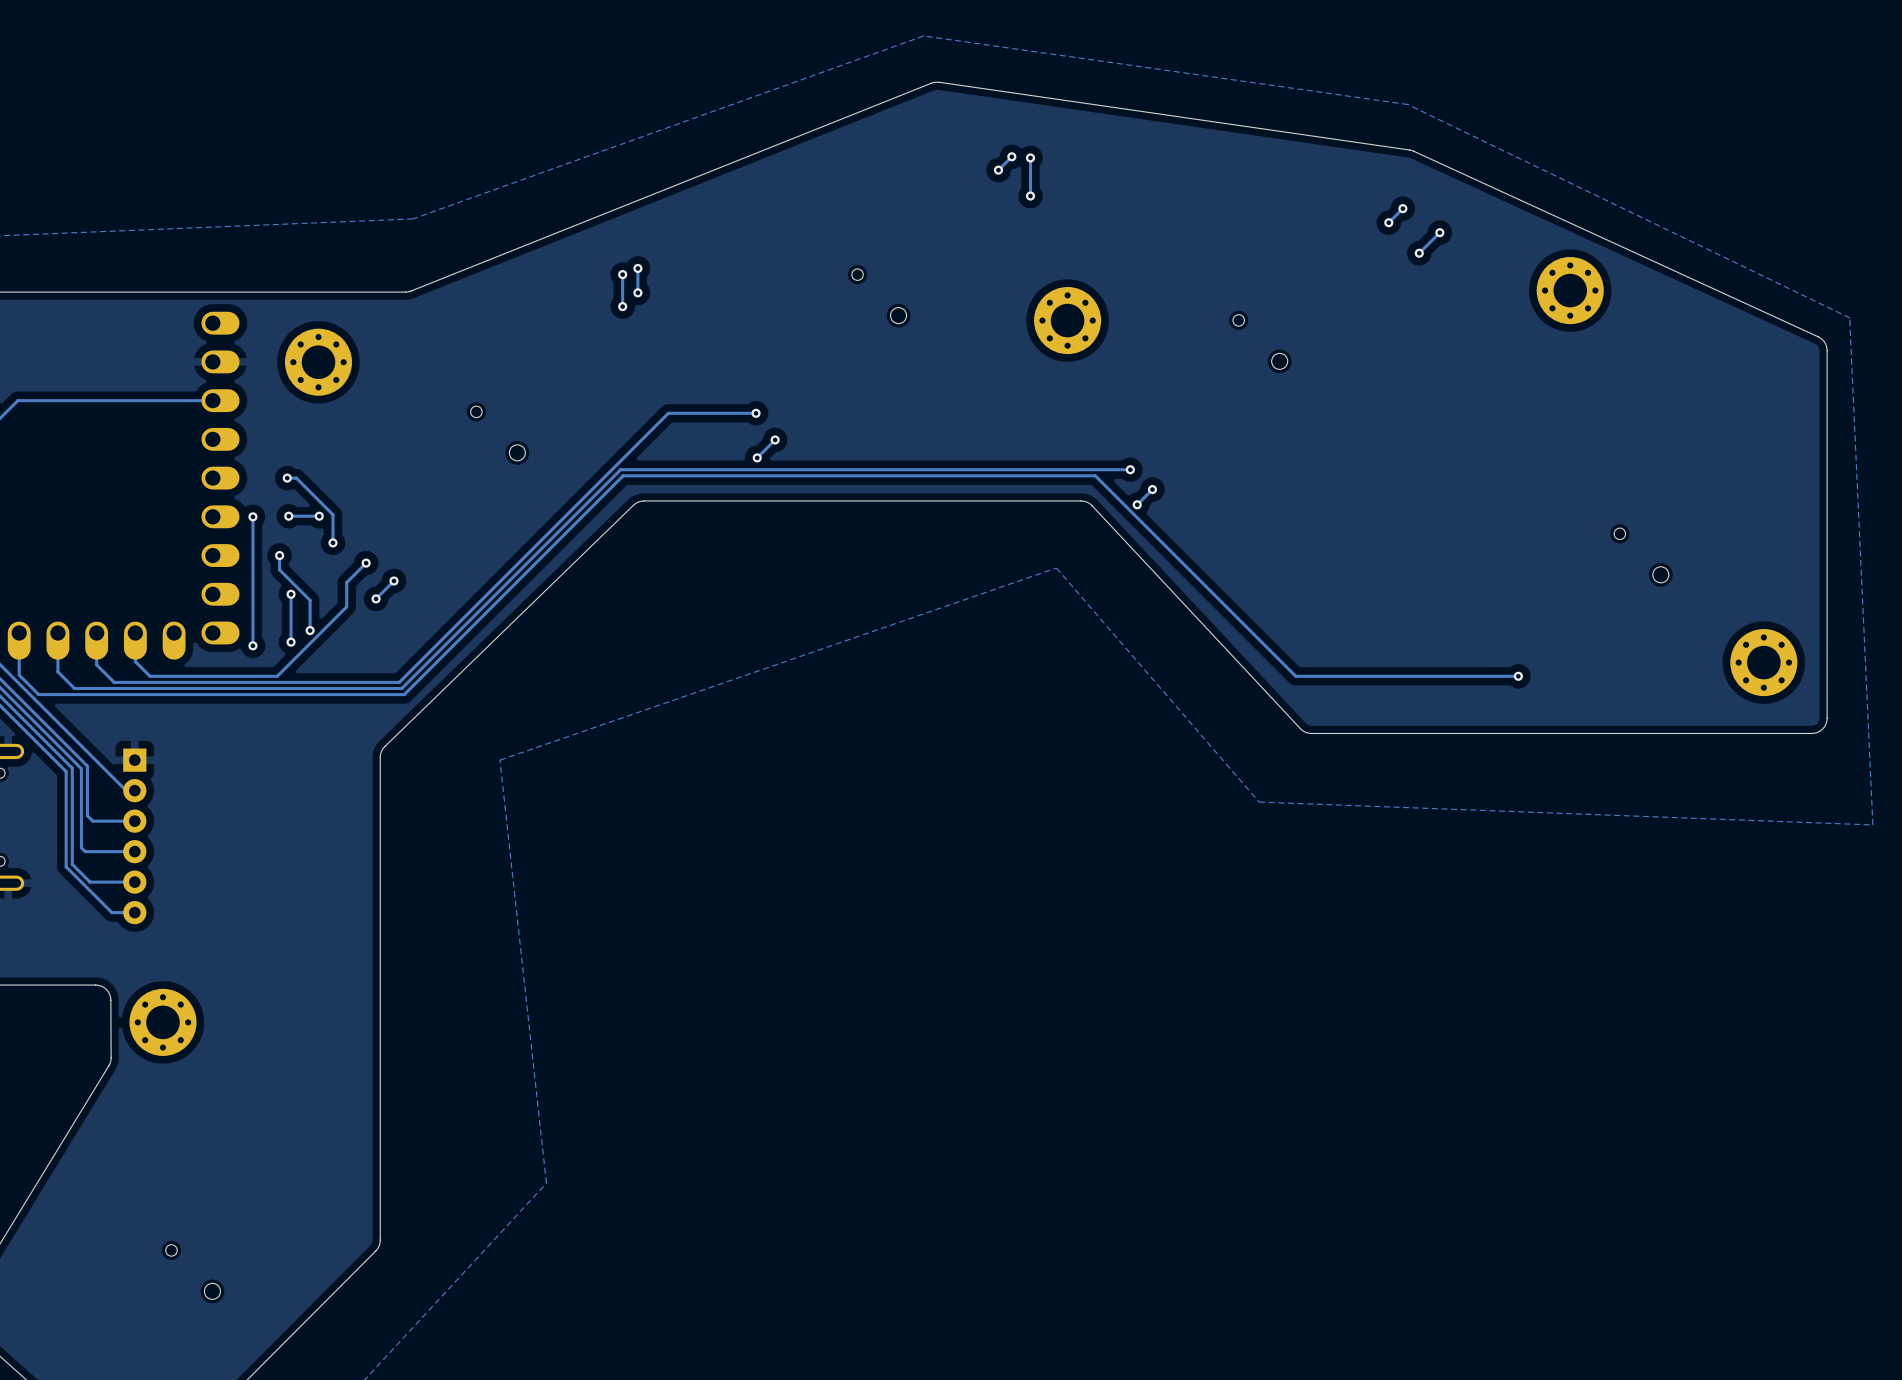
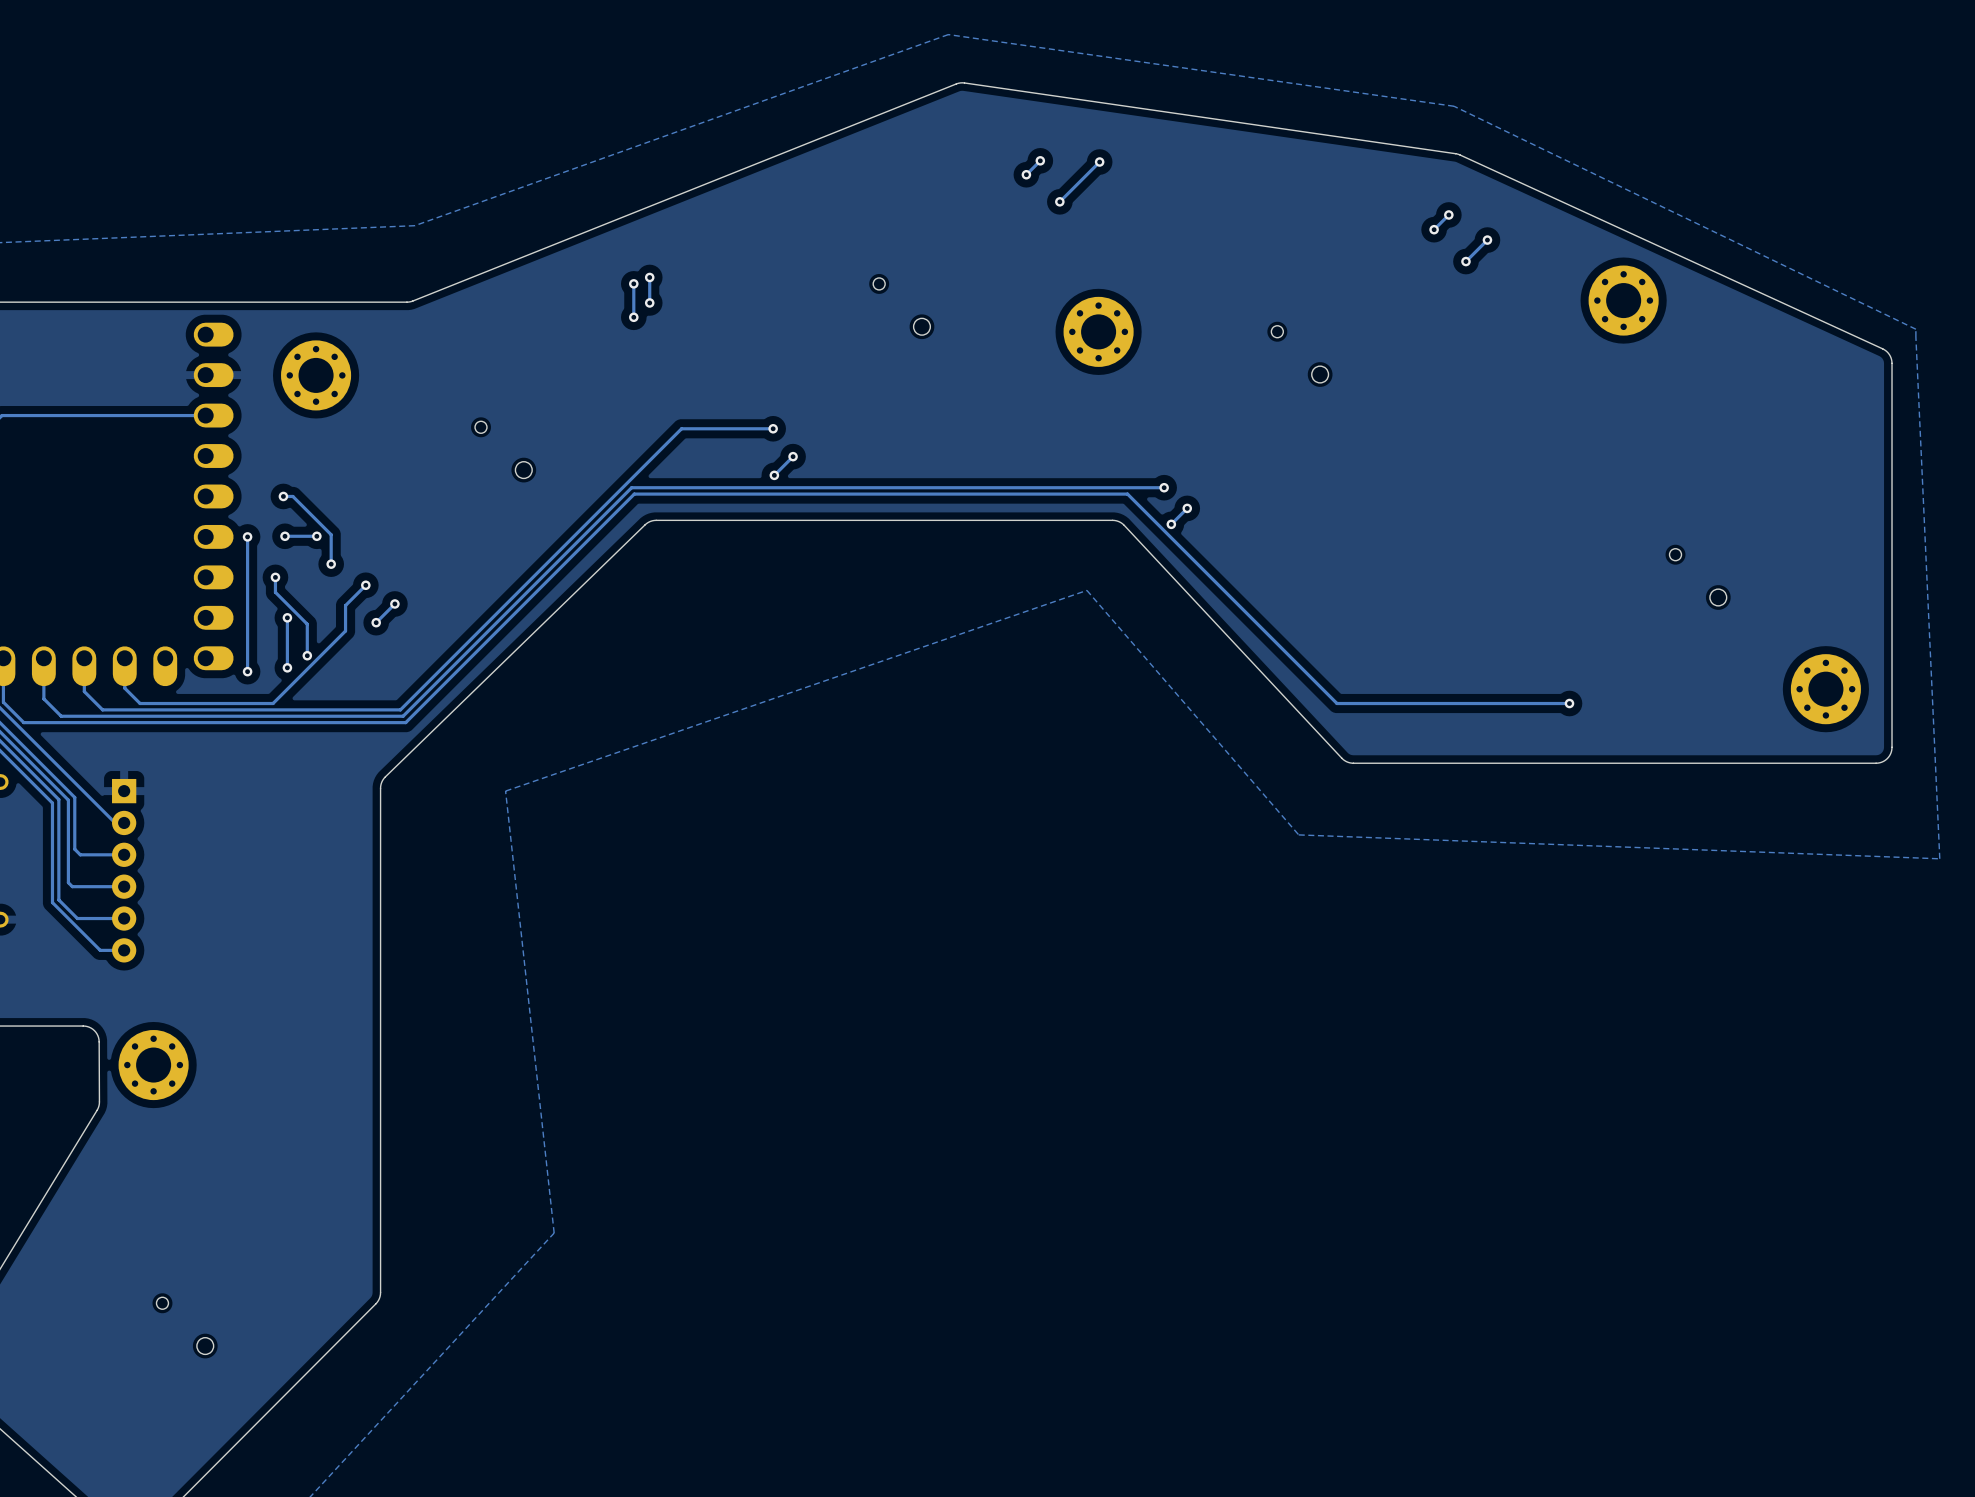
track: (1030, 157) (1030, 196) -> (1099, 162) (1059, 201)
via position: (1030, 157) -> (1099, 162)

